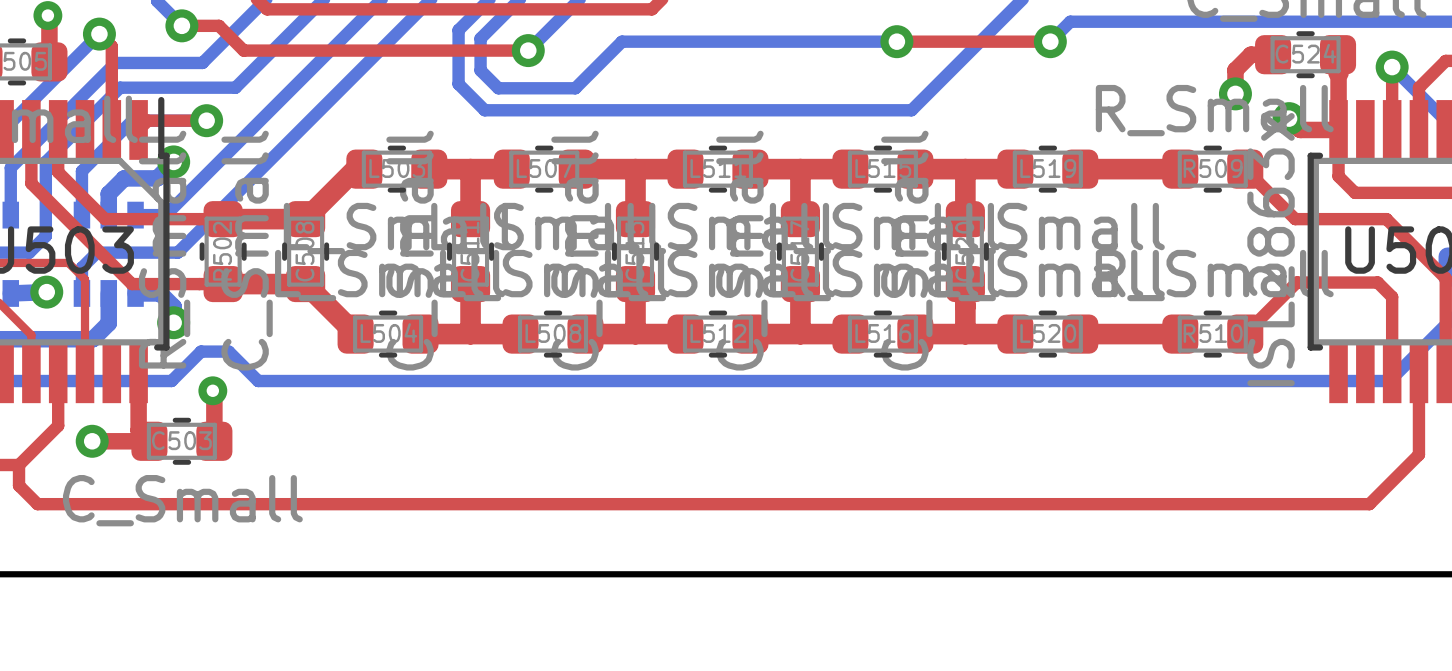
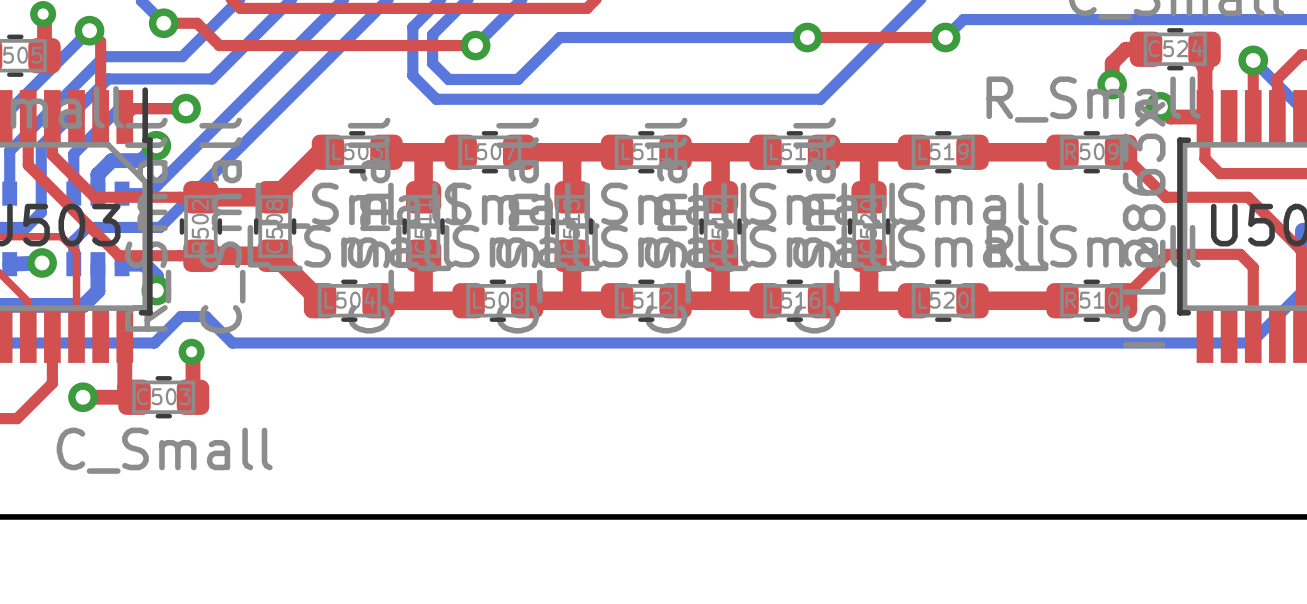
top track: (1418, 373) (1418, 454) (1369, 504) (37, 504) (19, 485) (19, 465) -> none

